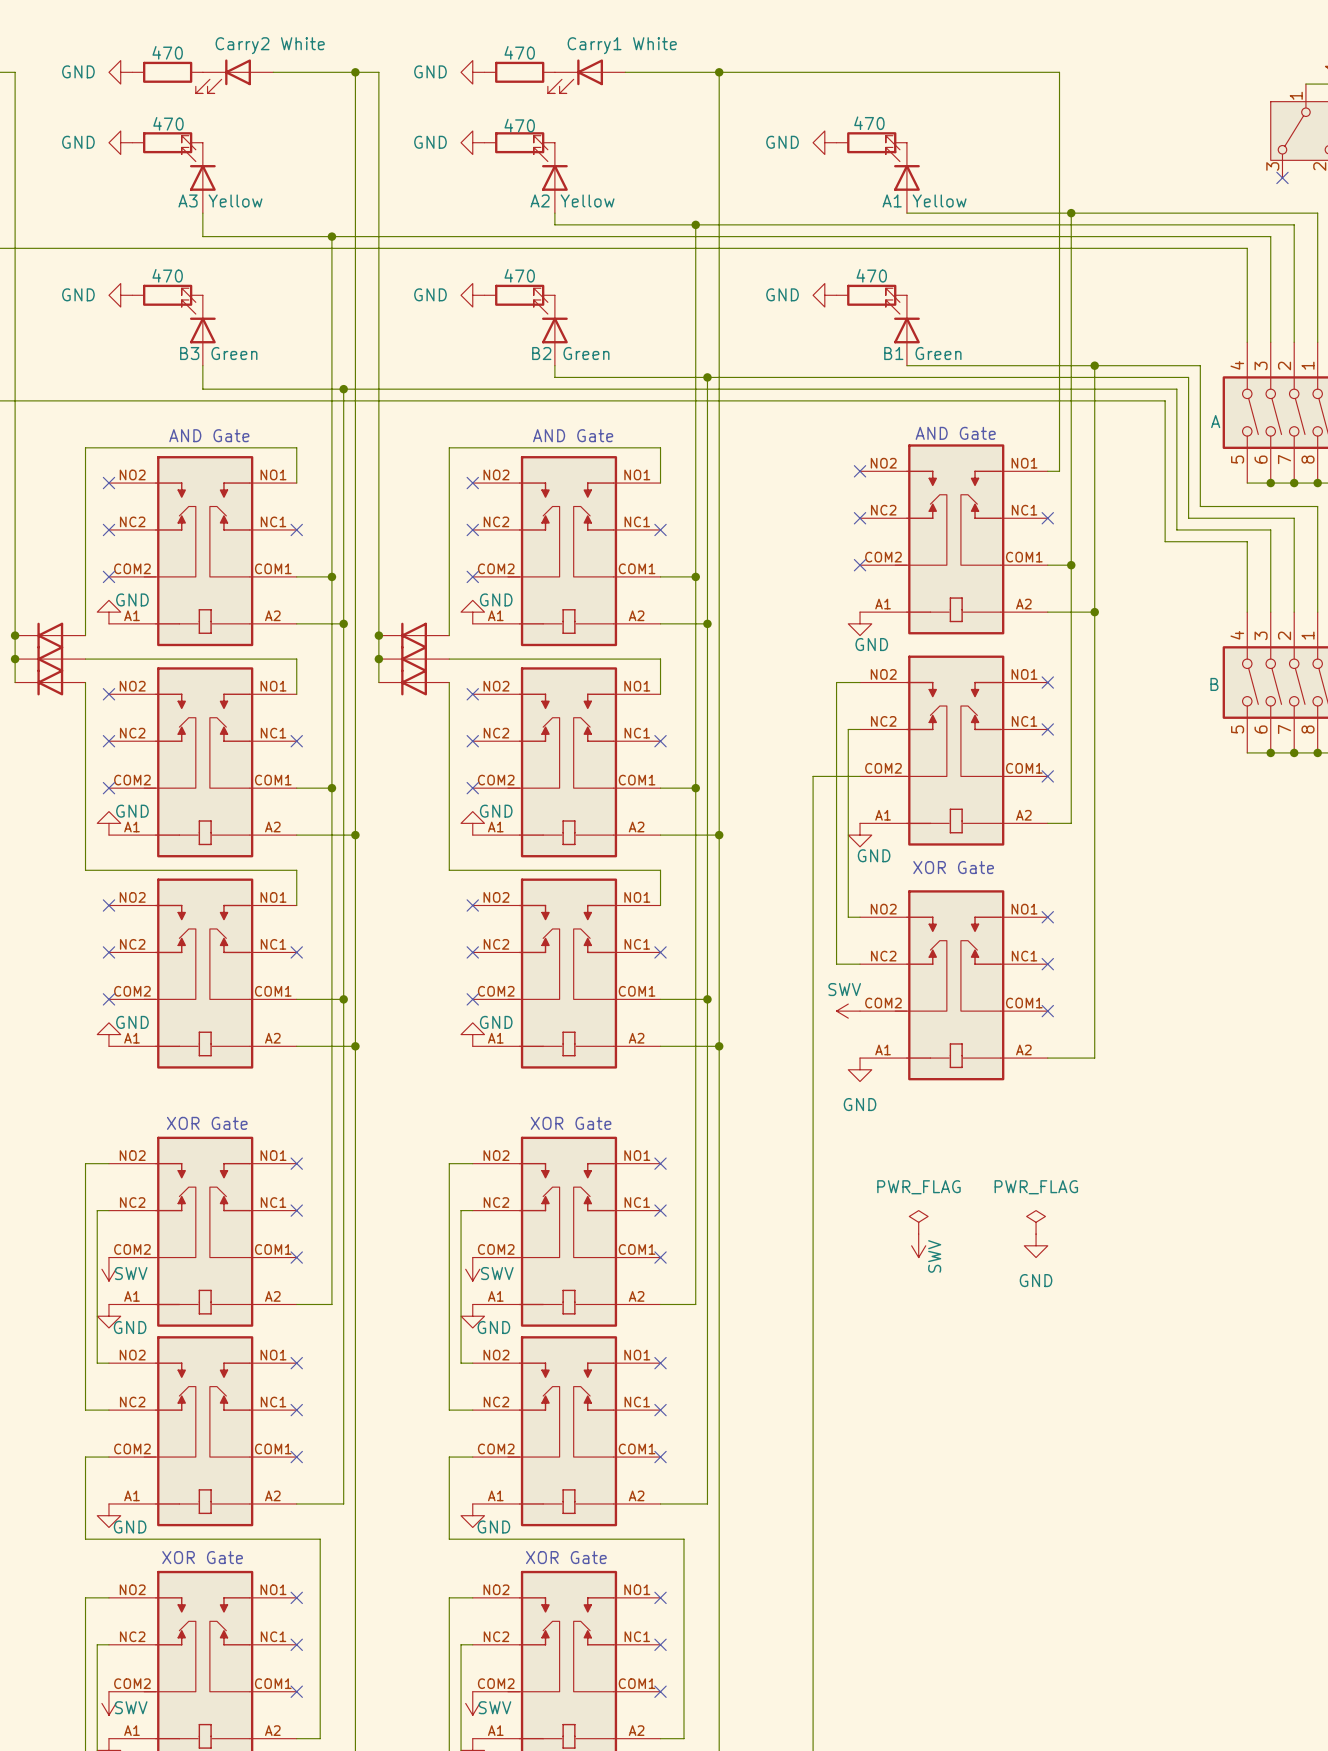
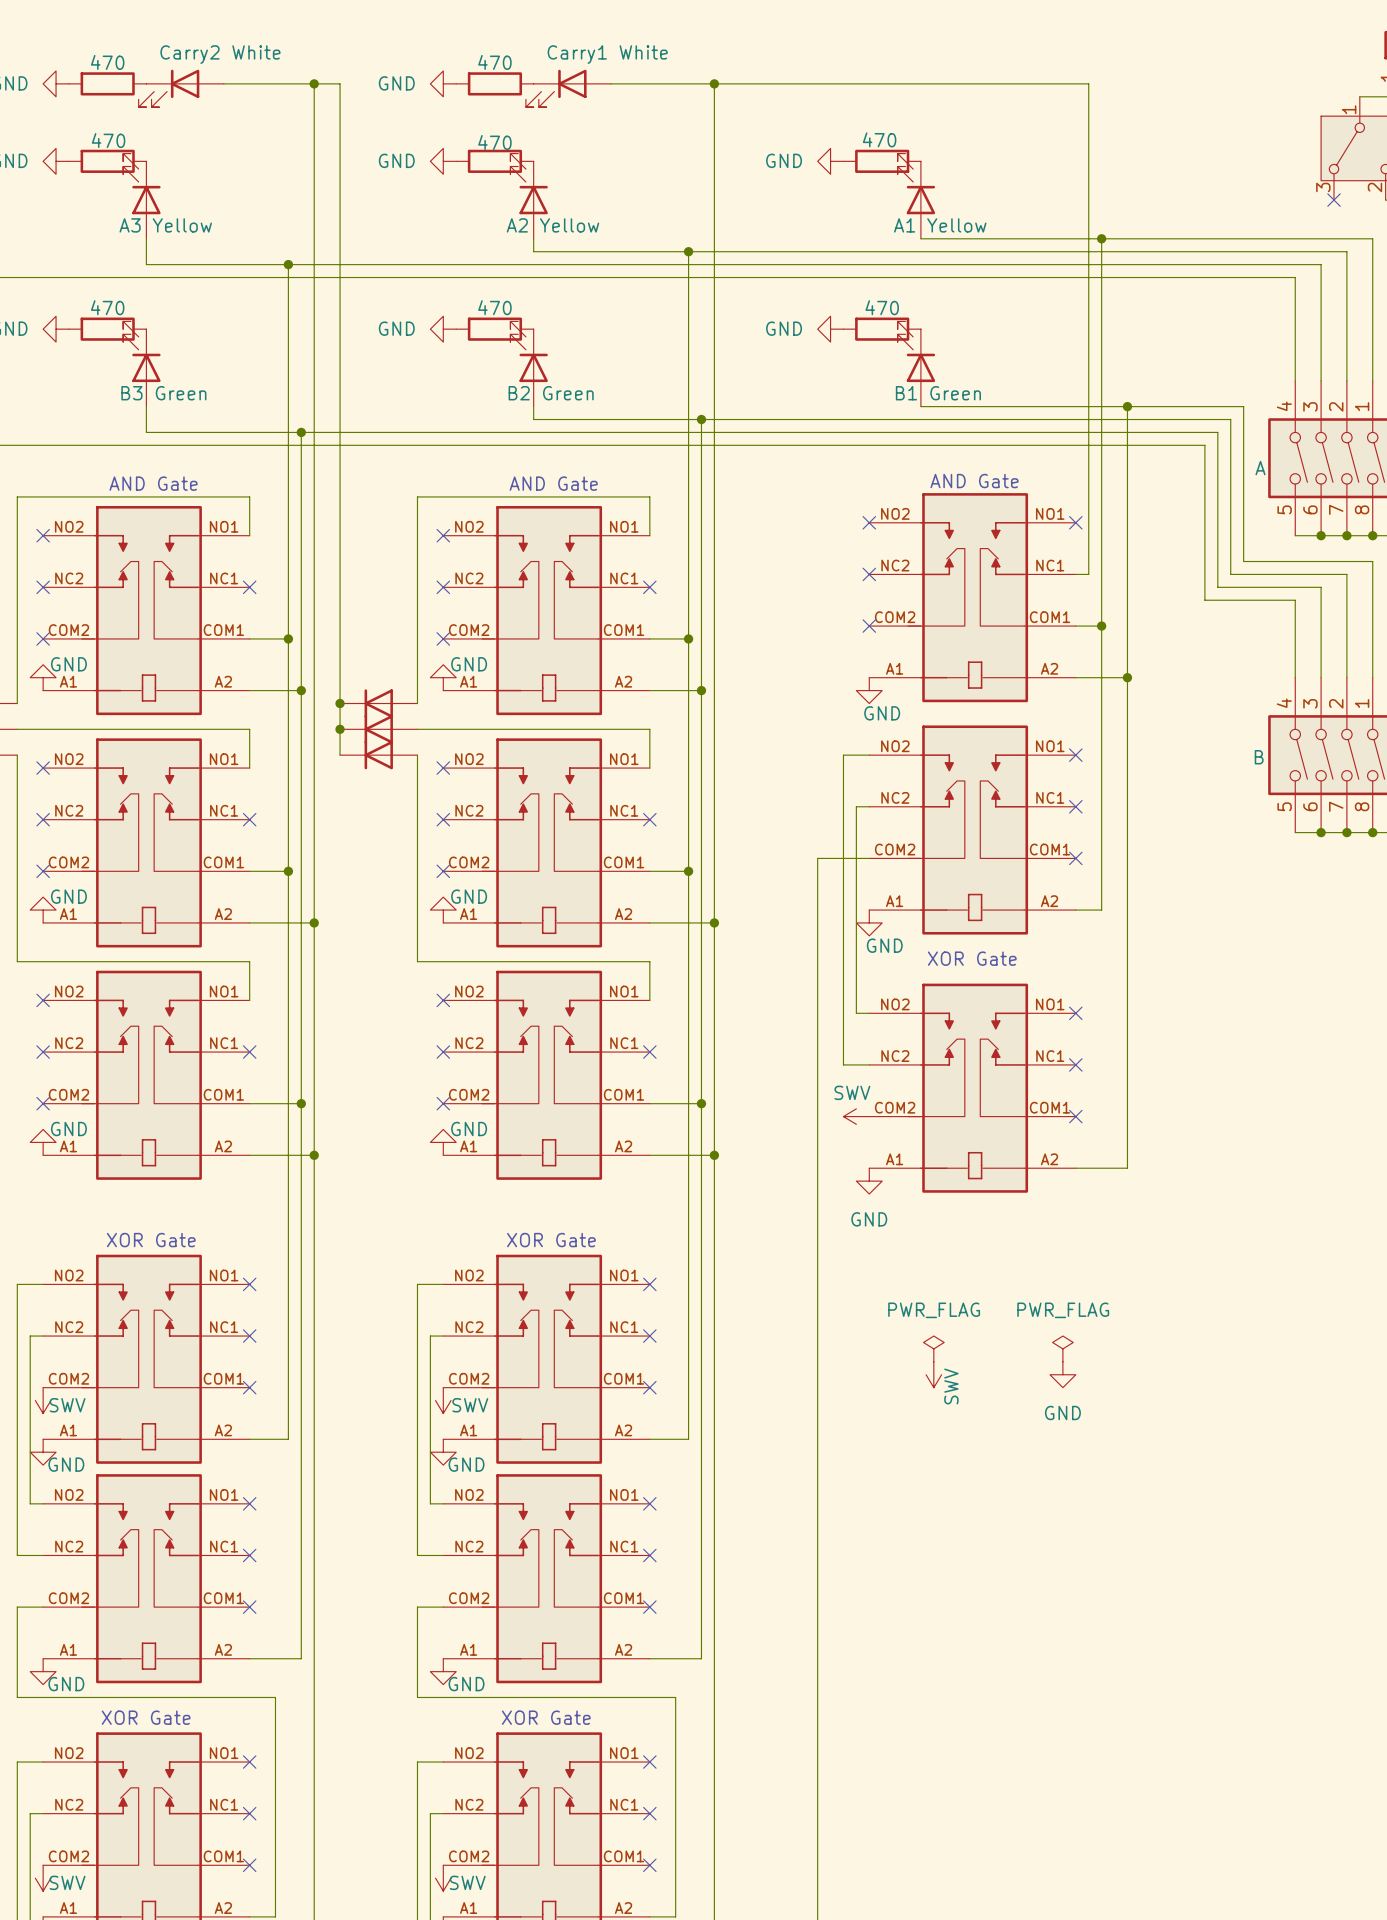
wire: (1047, 471) (1059, 471) -> (1075, 574) (1088, 574) (1088, 522)
no-connect mark position: (1047, 518) -> (1075, 522)

